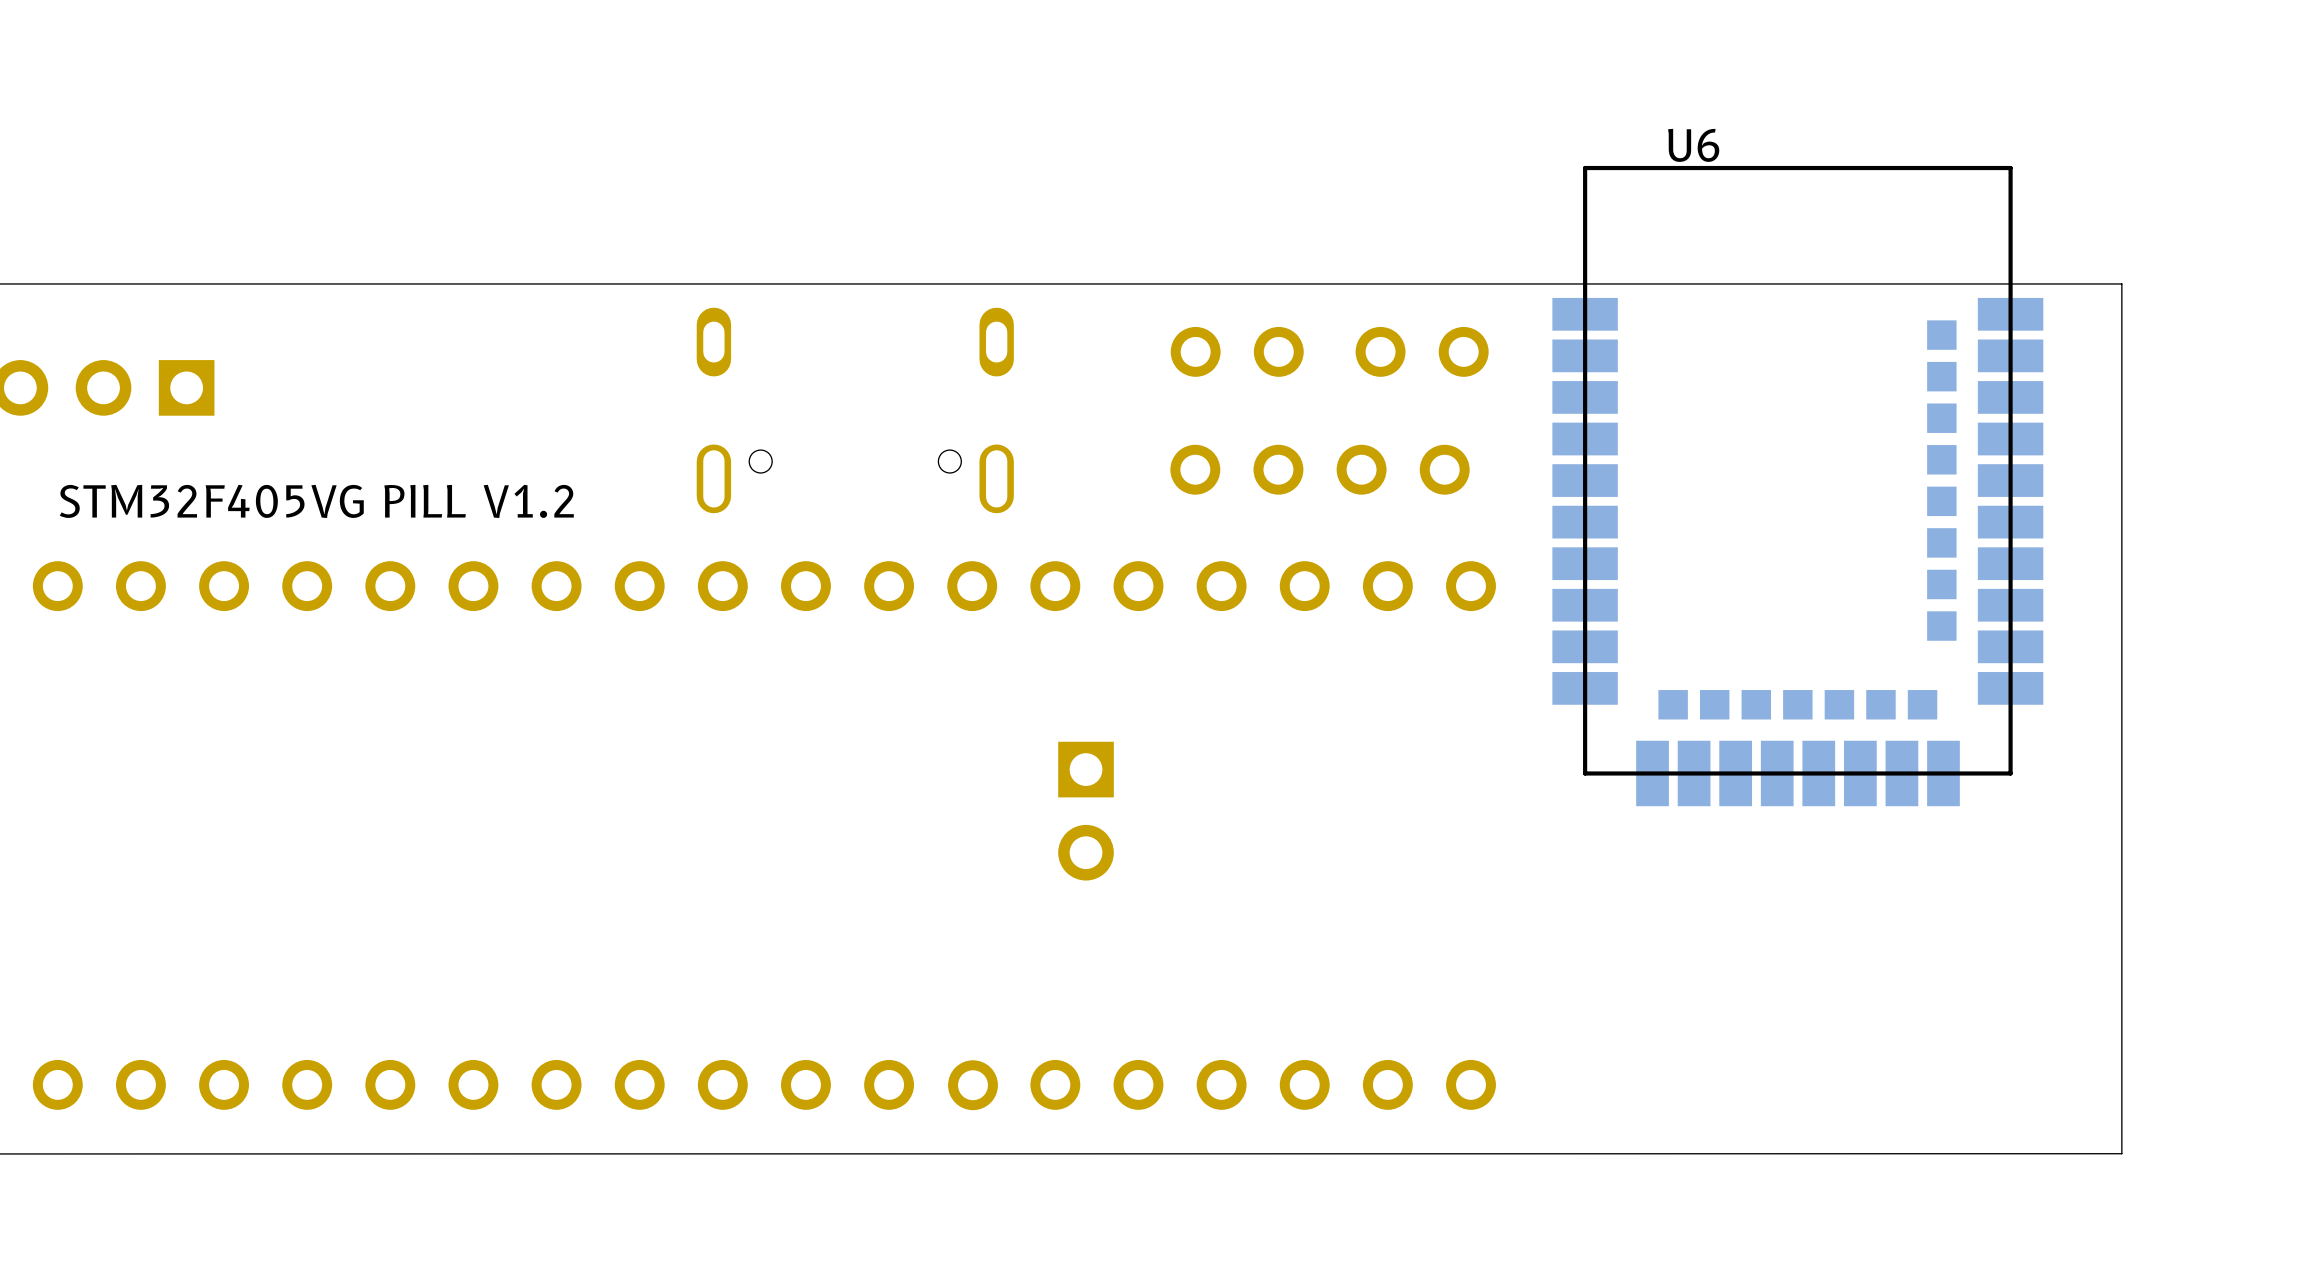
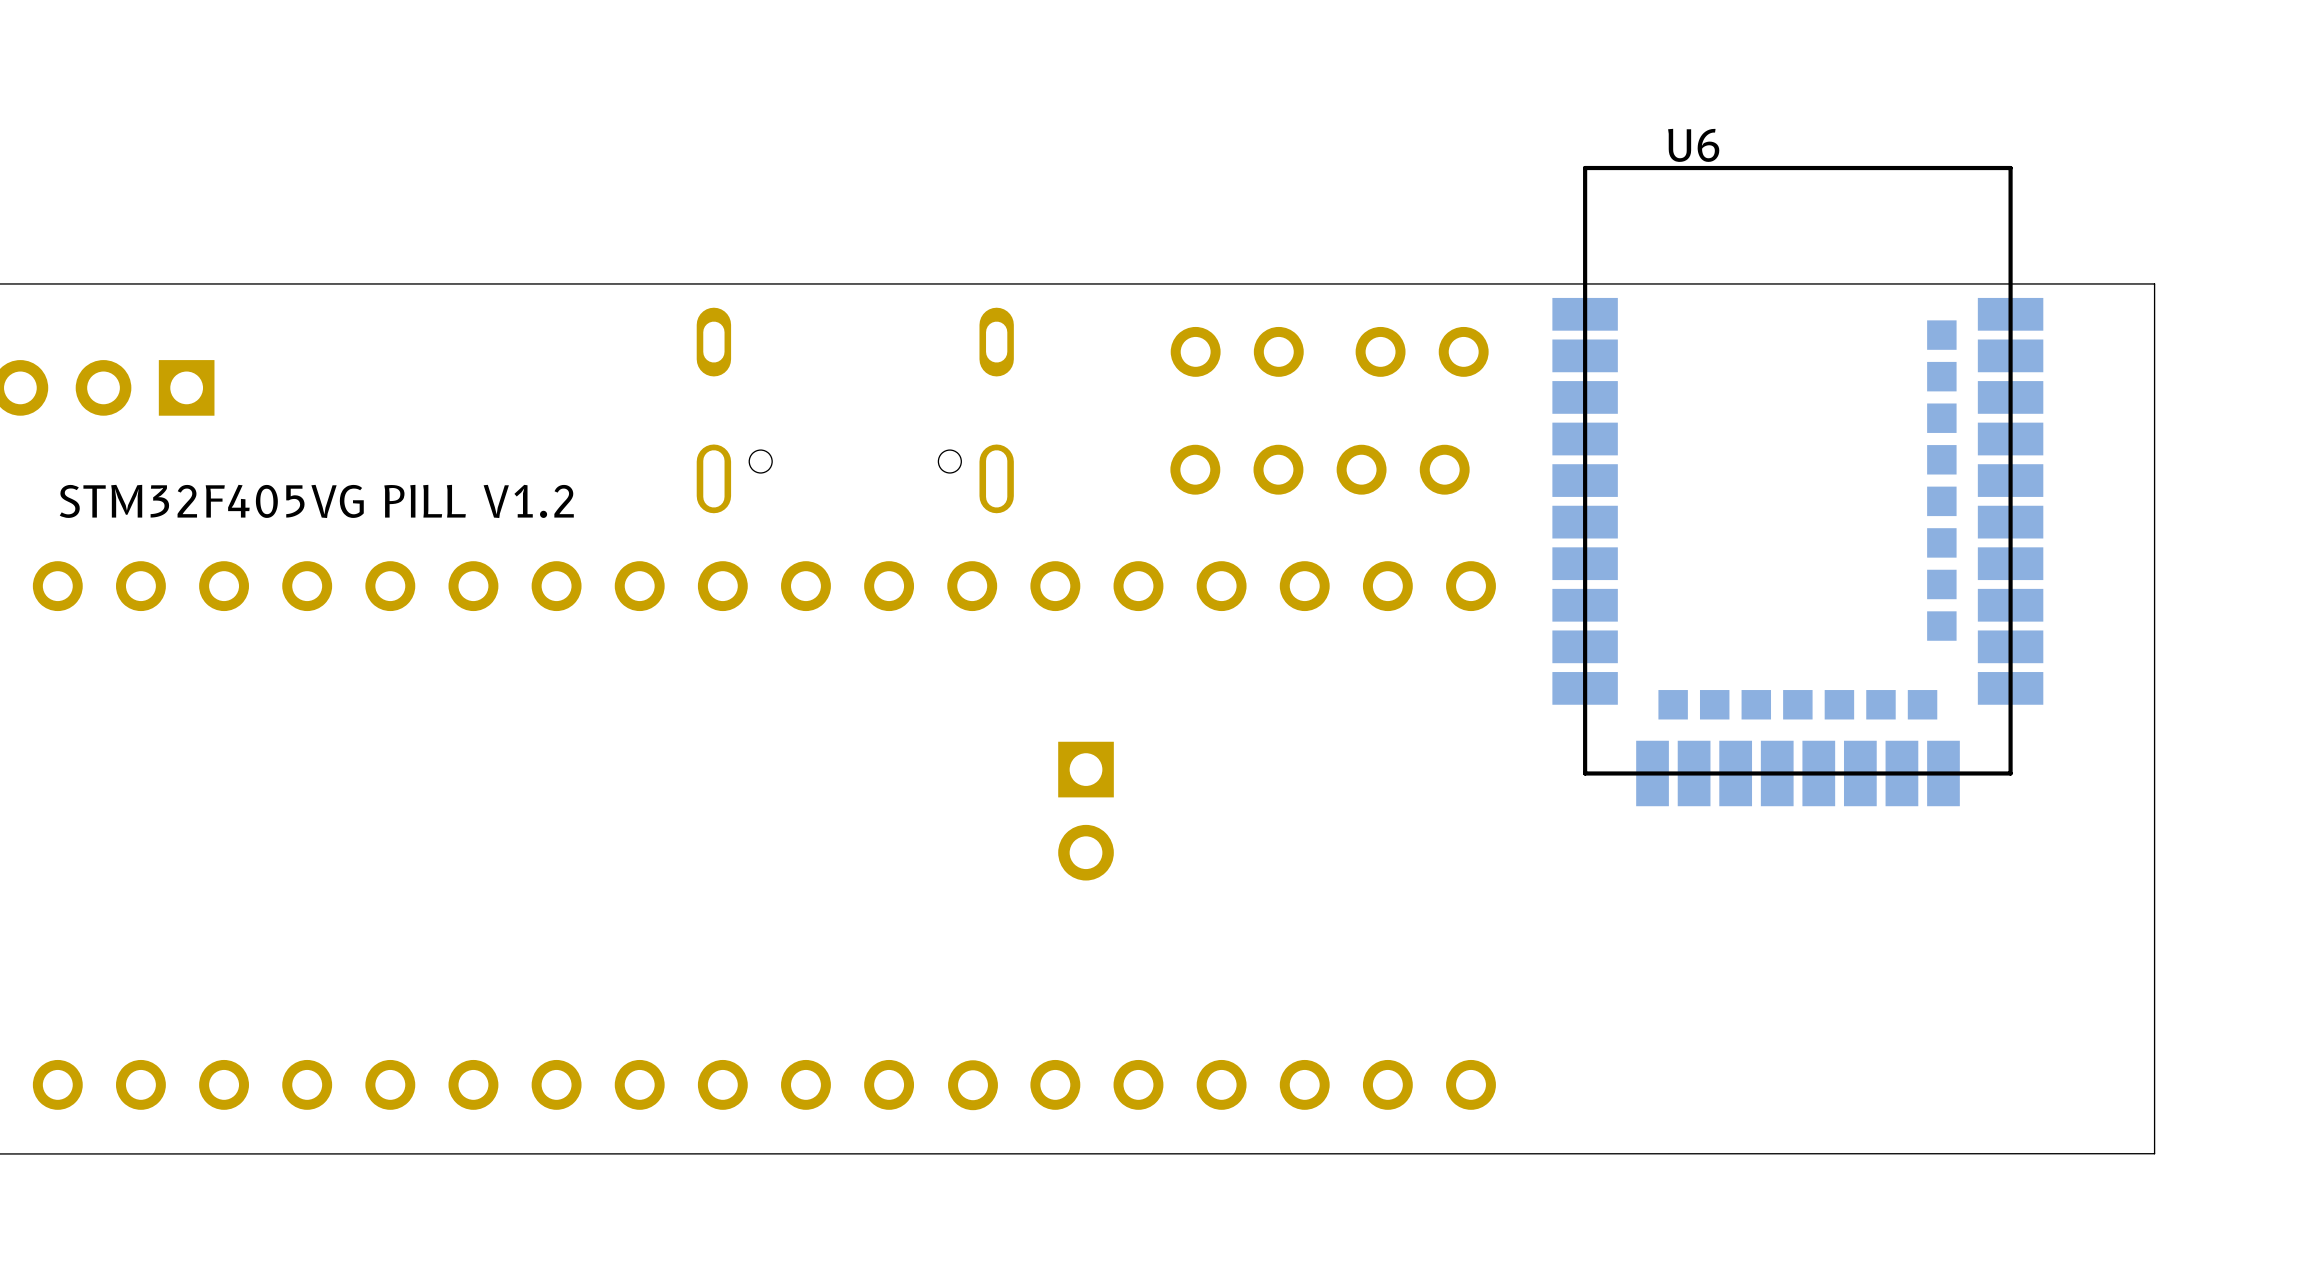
board edge: (2121, 283) (2121, 1153) -> (2121, 283) (2154, 283) (2154, 1153) (2121, 1153)

